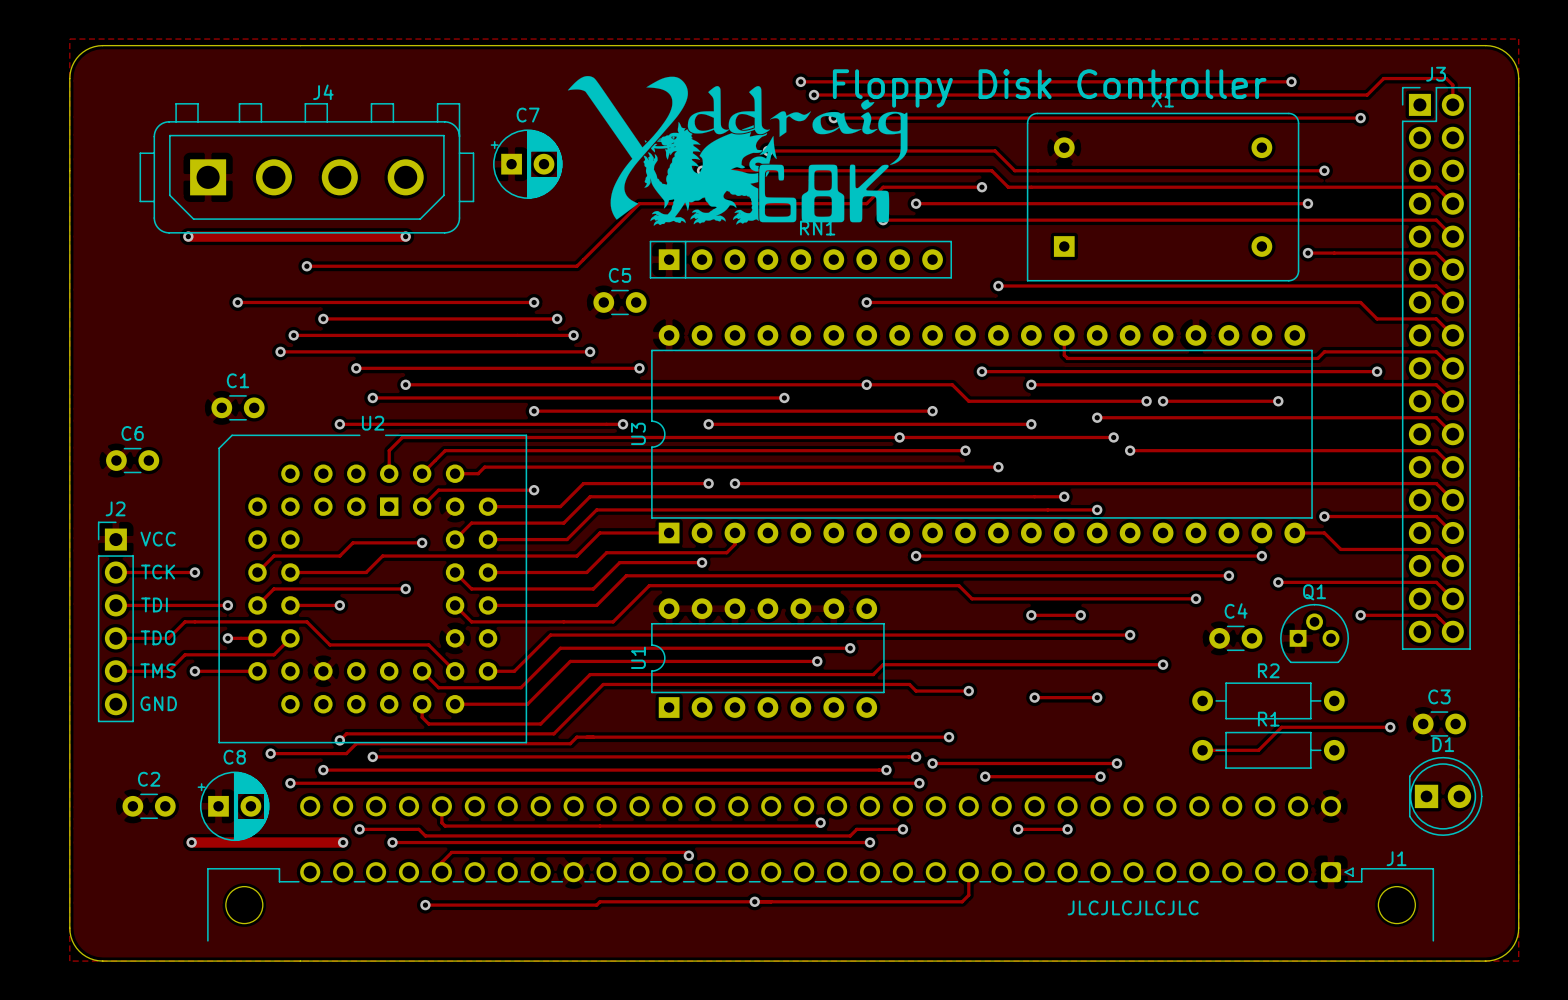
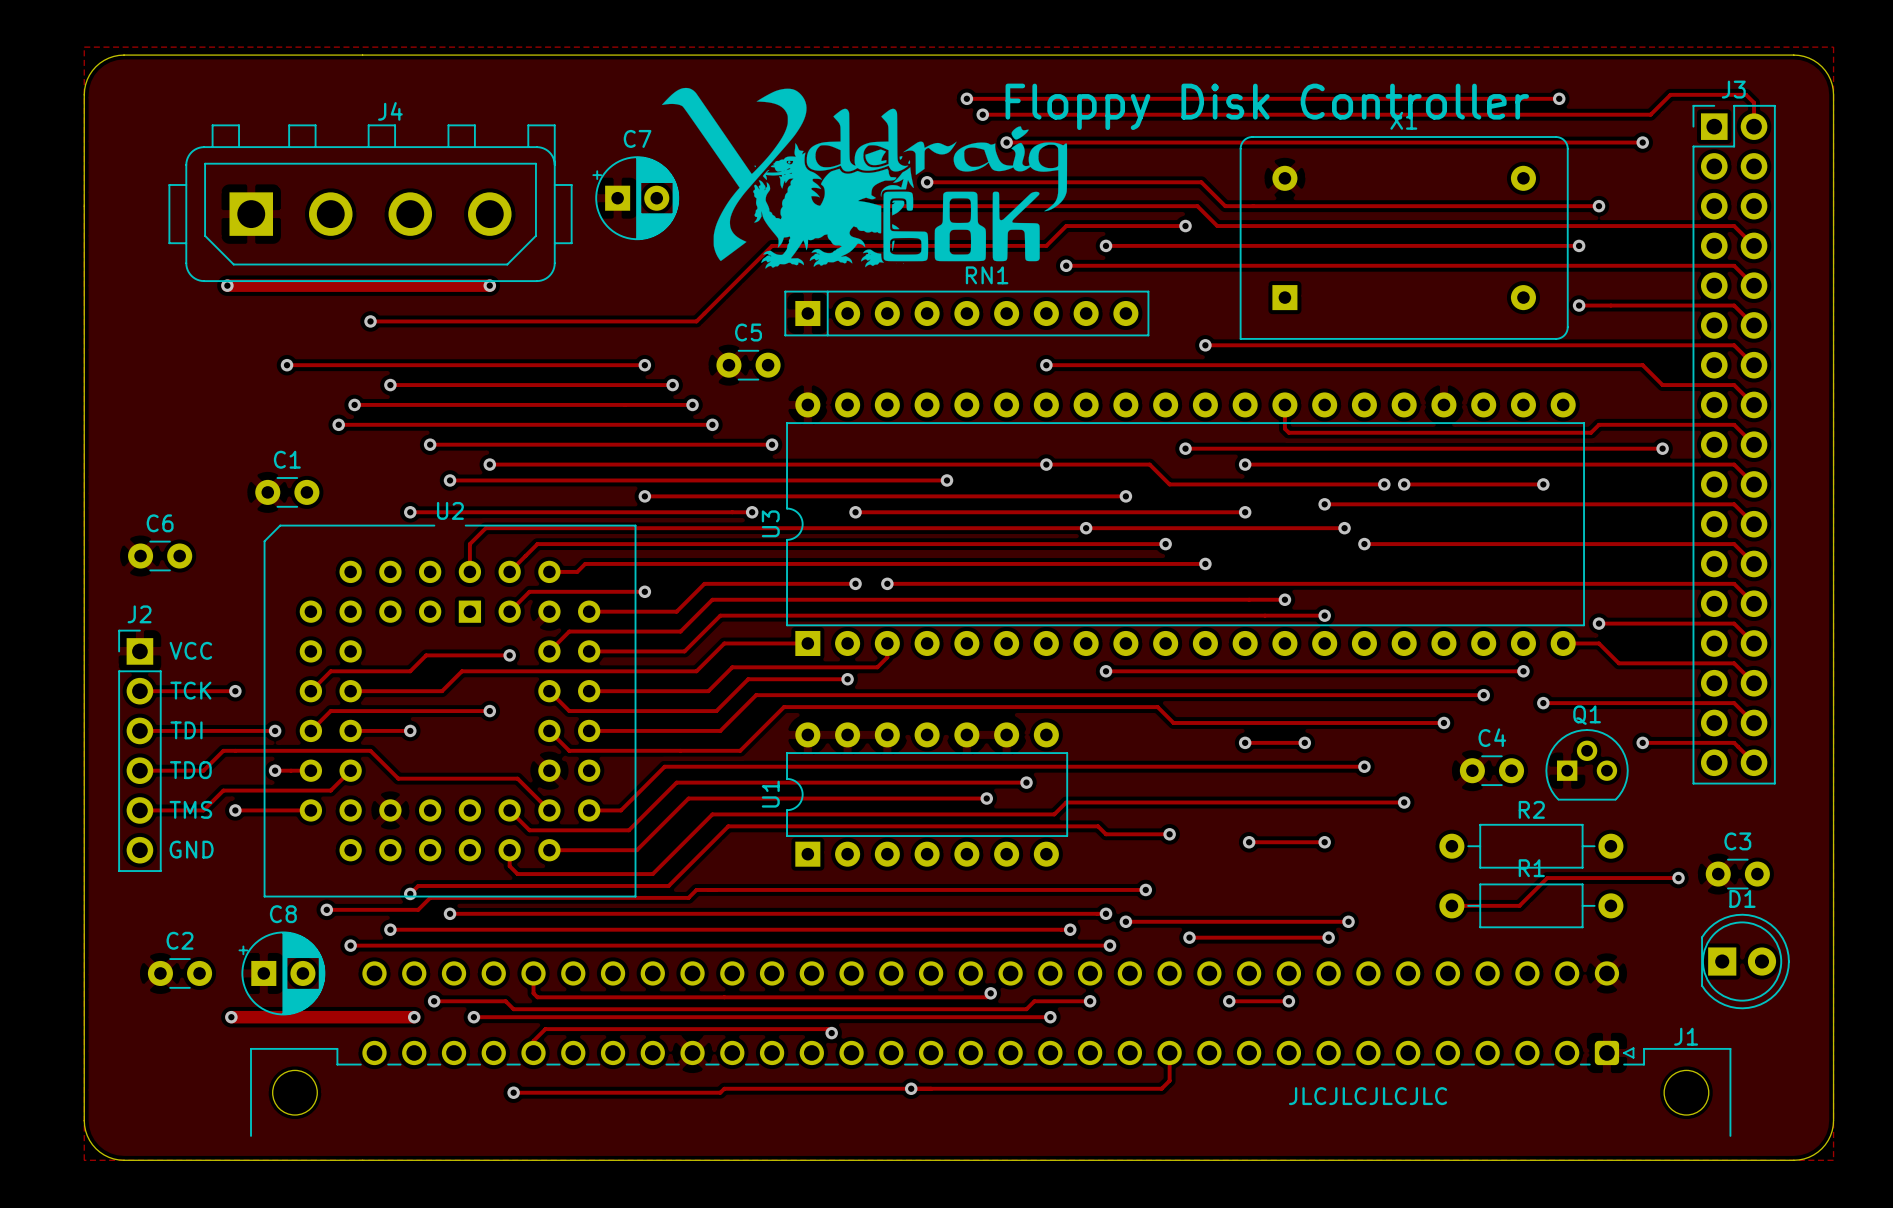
drawing: none -> [662, 87, 1068, 269]
drawing: [567, 76, 908, 226] -> none

